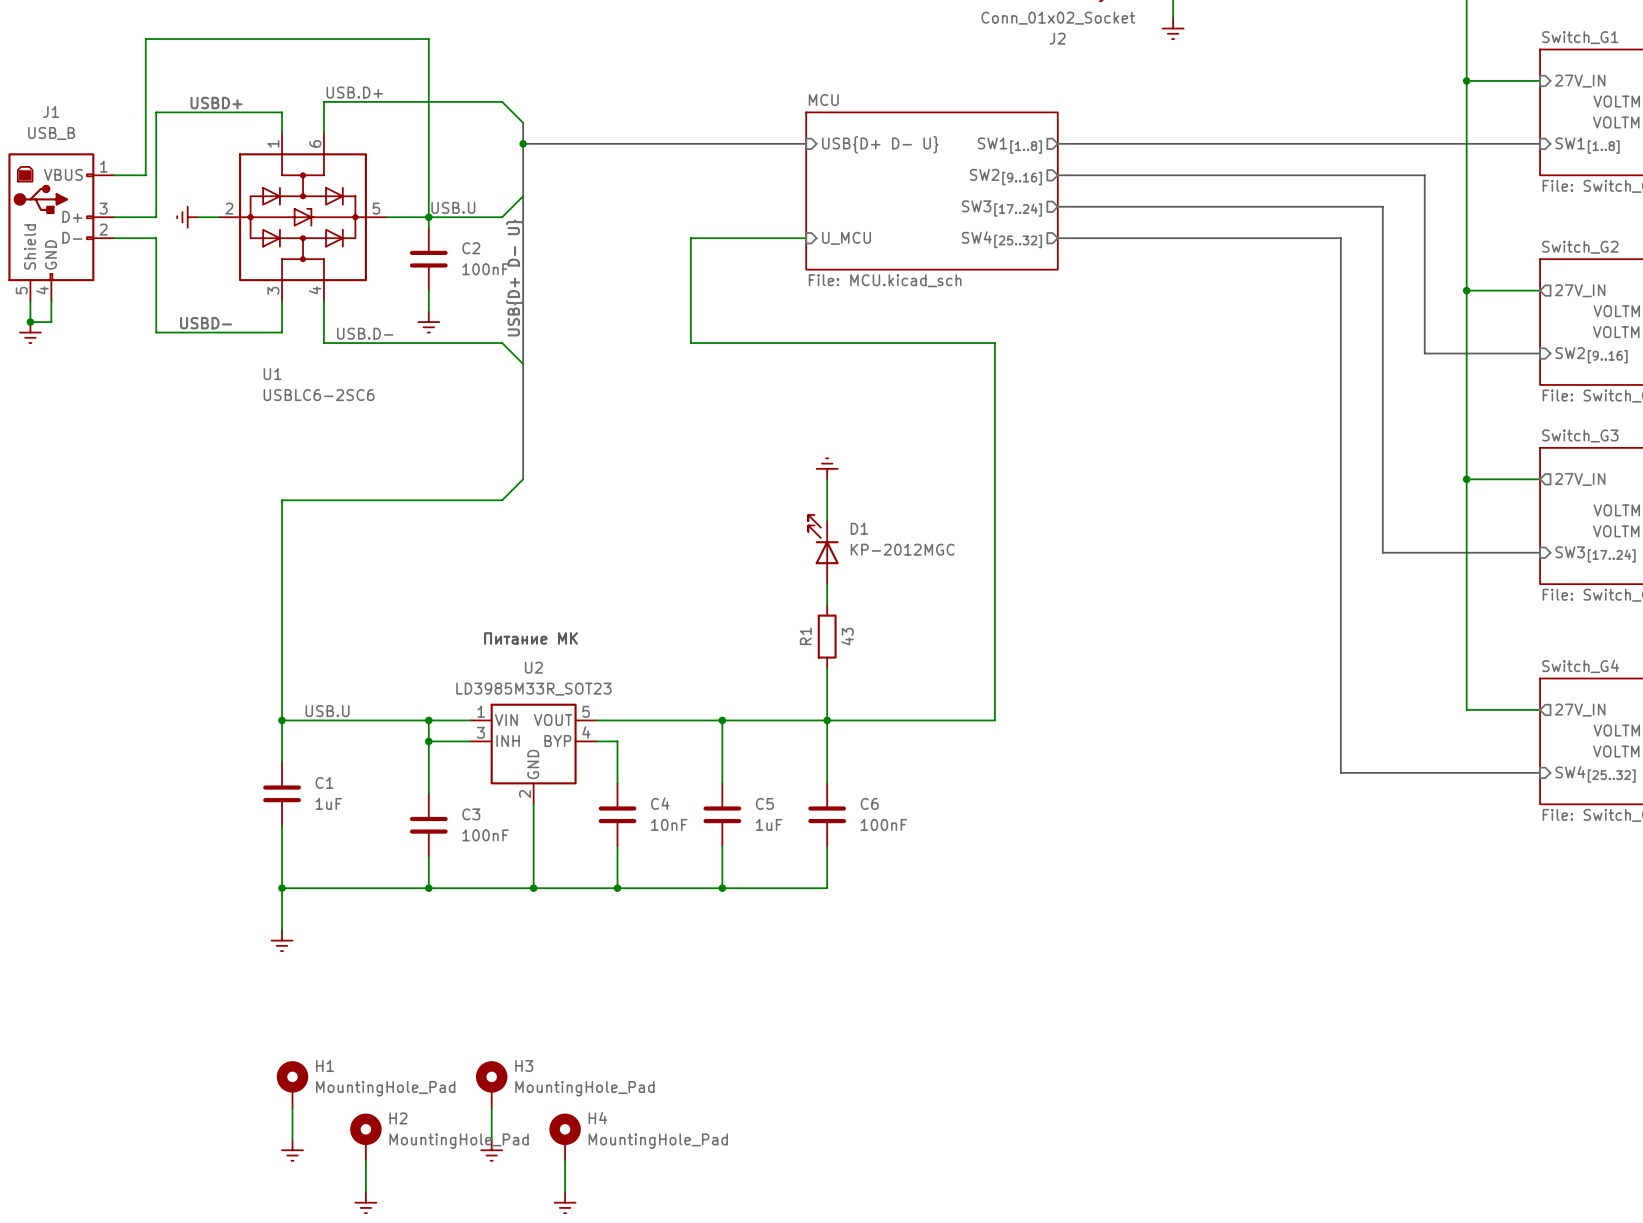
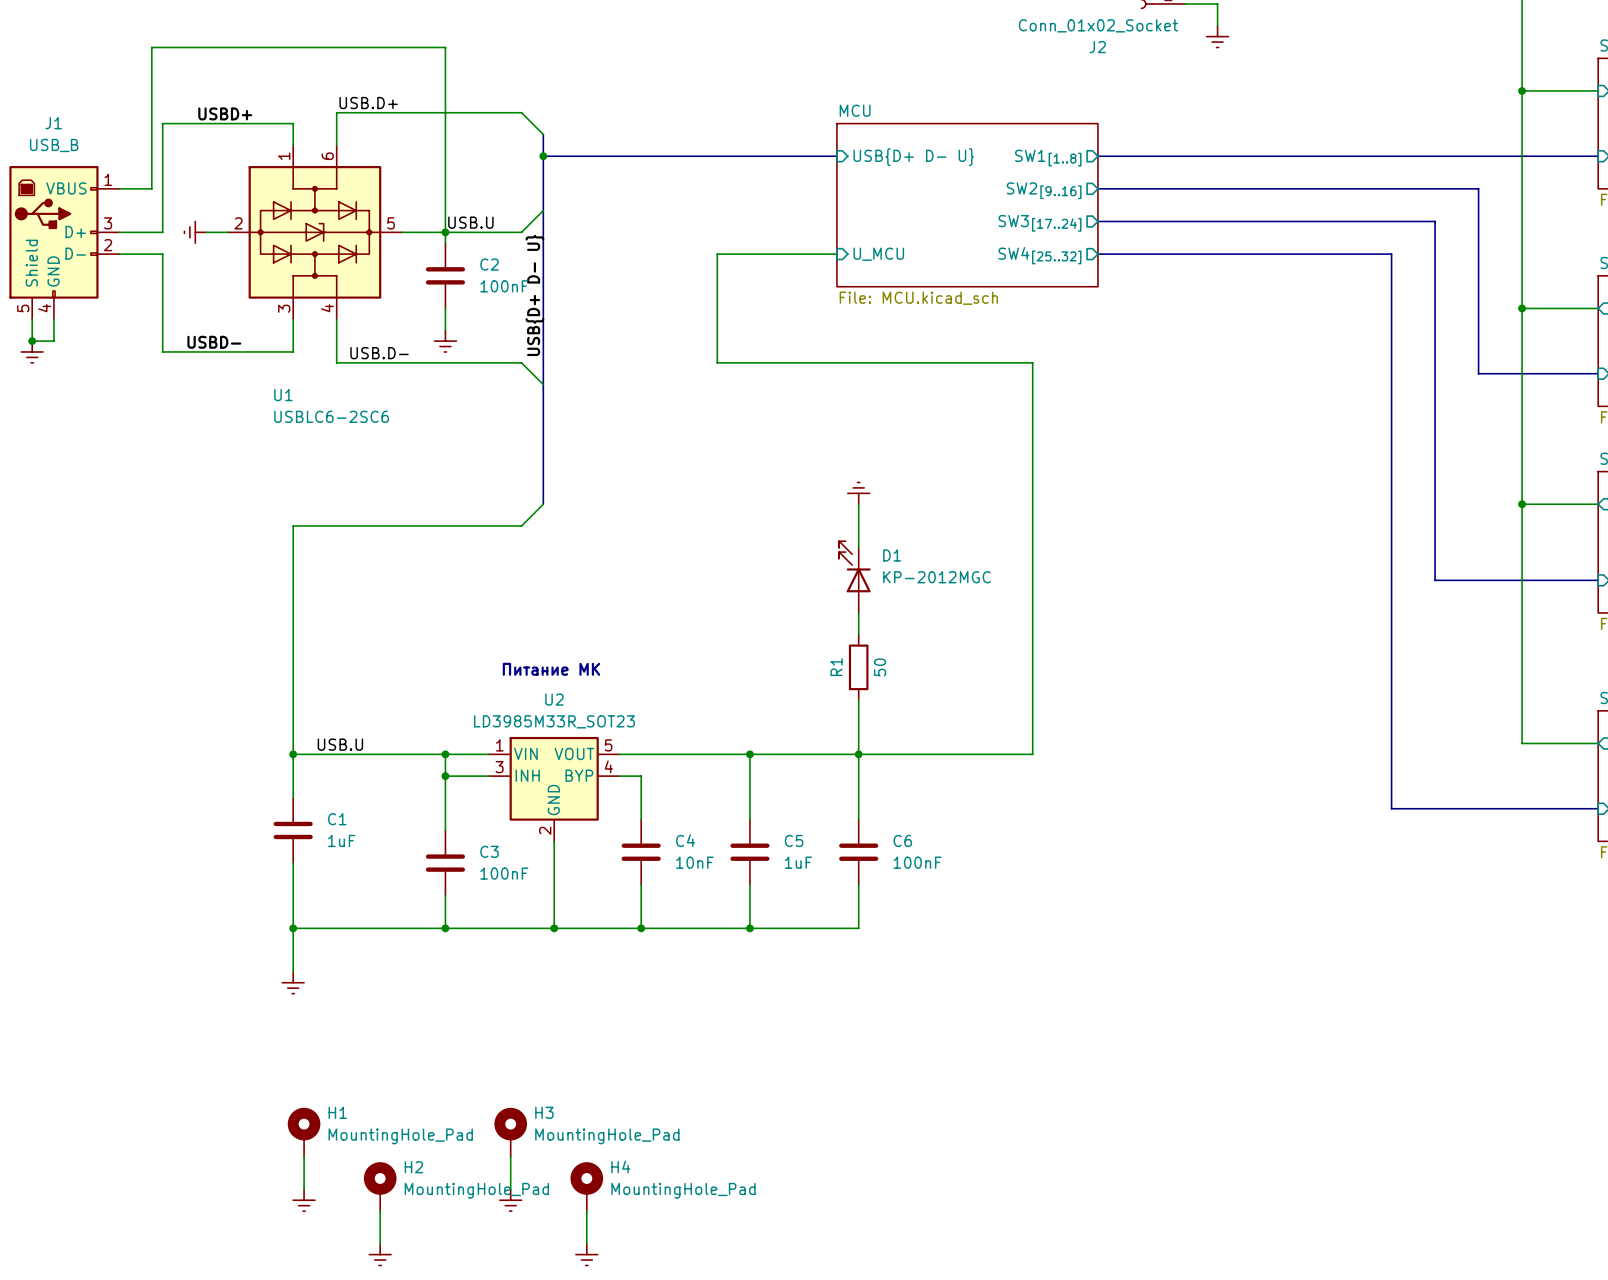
R1 value: 43 (847, 636) -> 50 (880, 667)

